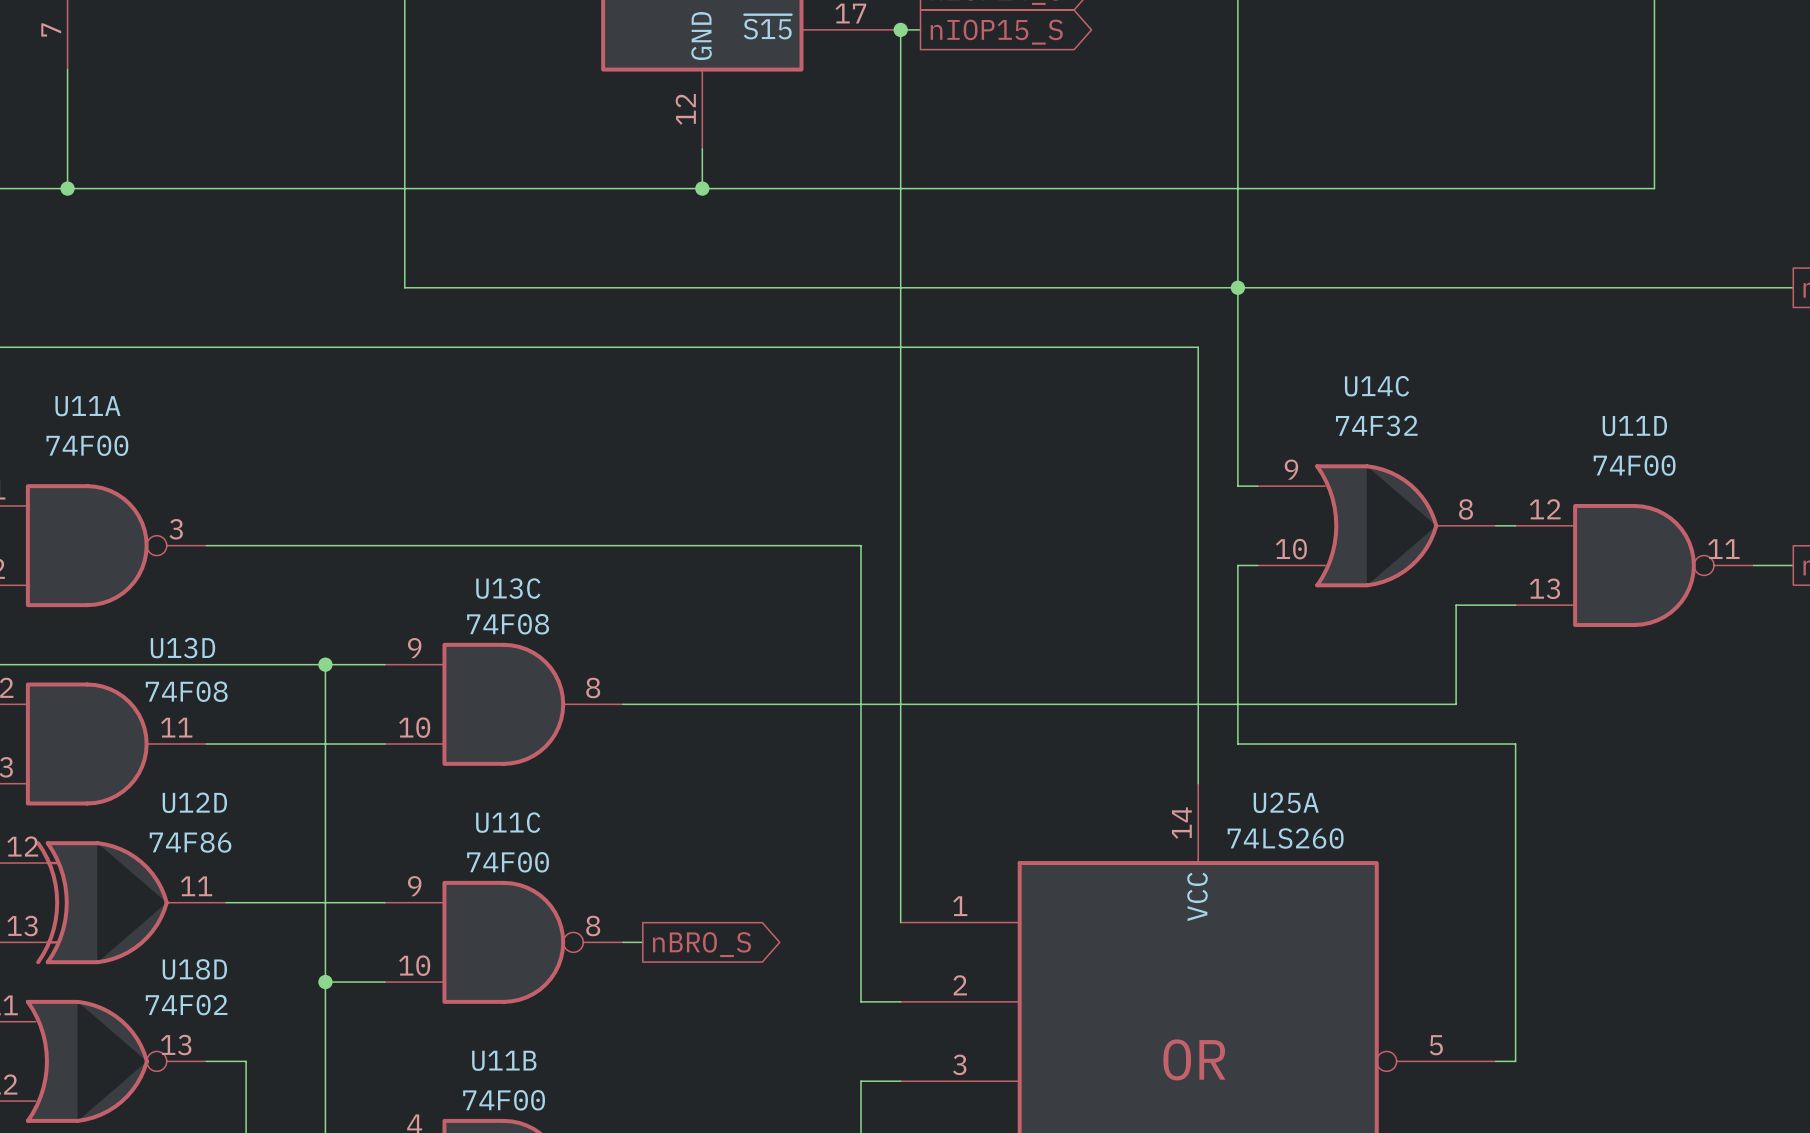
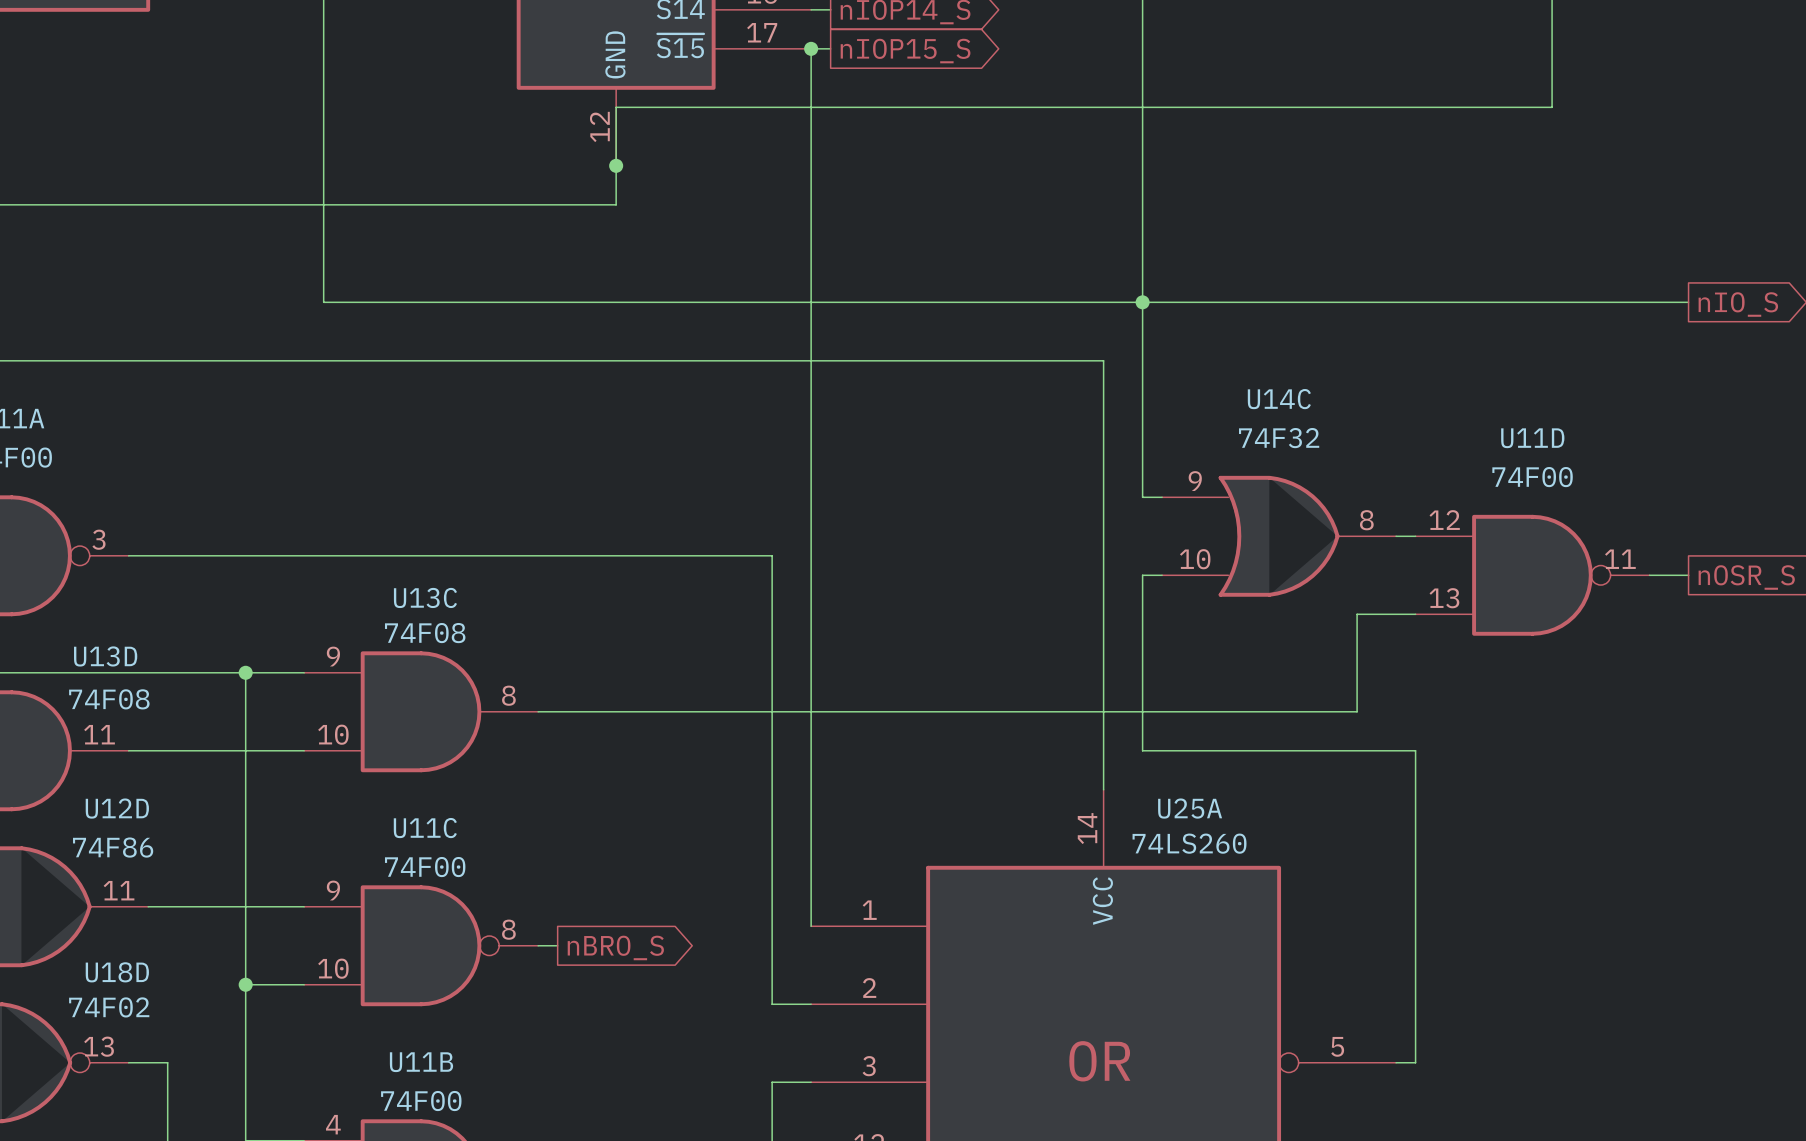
wire: (1654, 89) (1654, 188) (702, 188) -> (1552, 107) (616, 107) (616, 165)
junction position: (702, 188) -> (616, 165)

